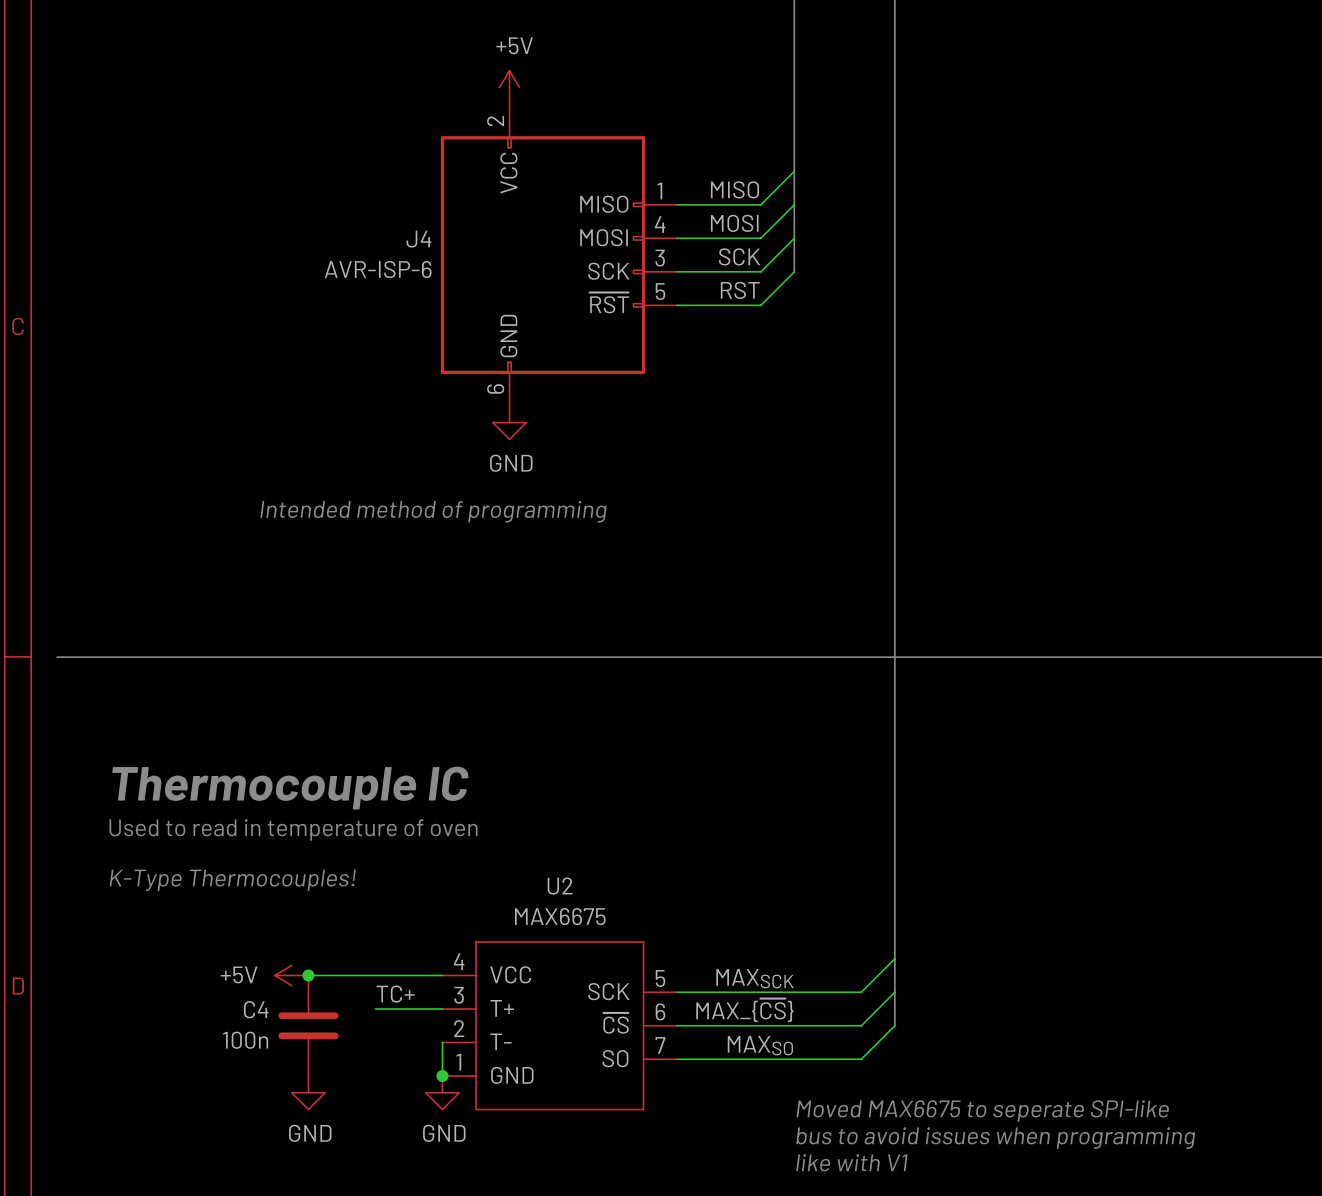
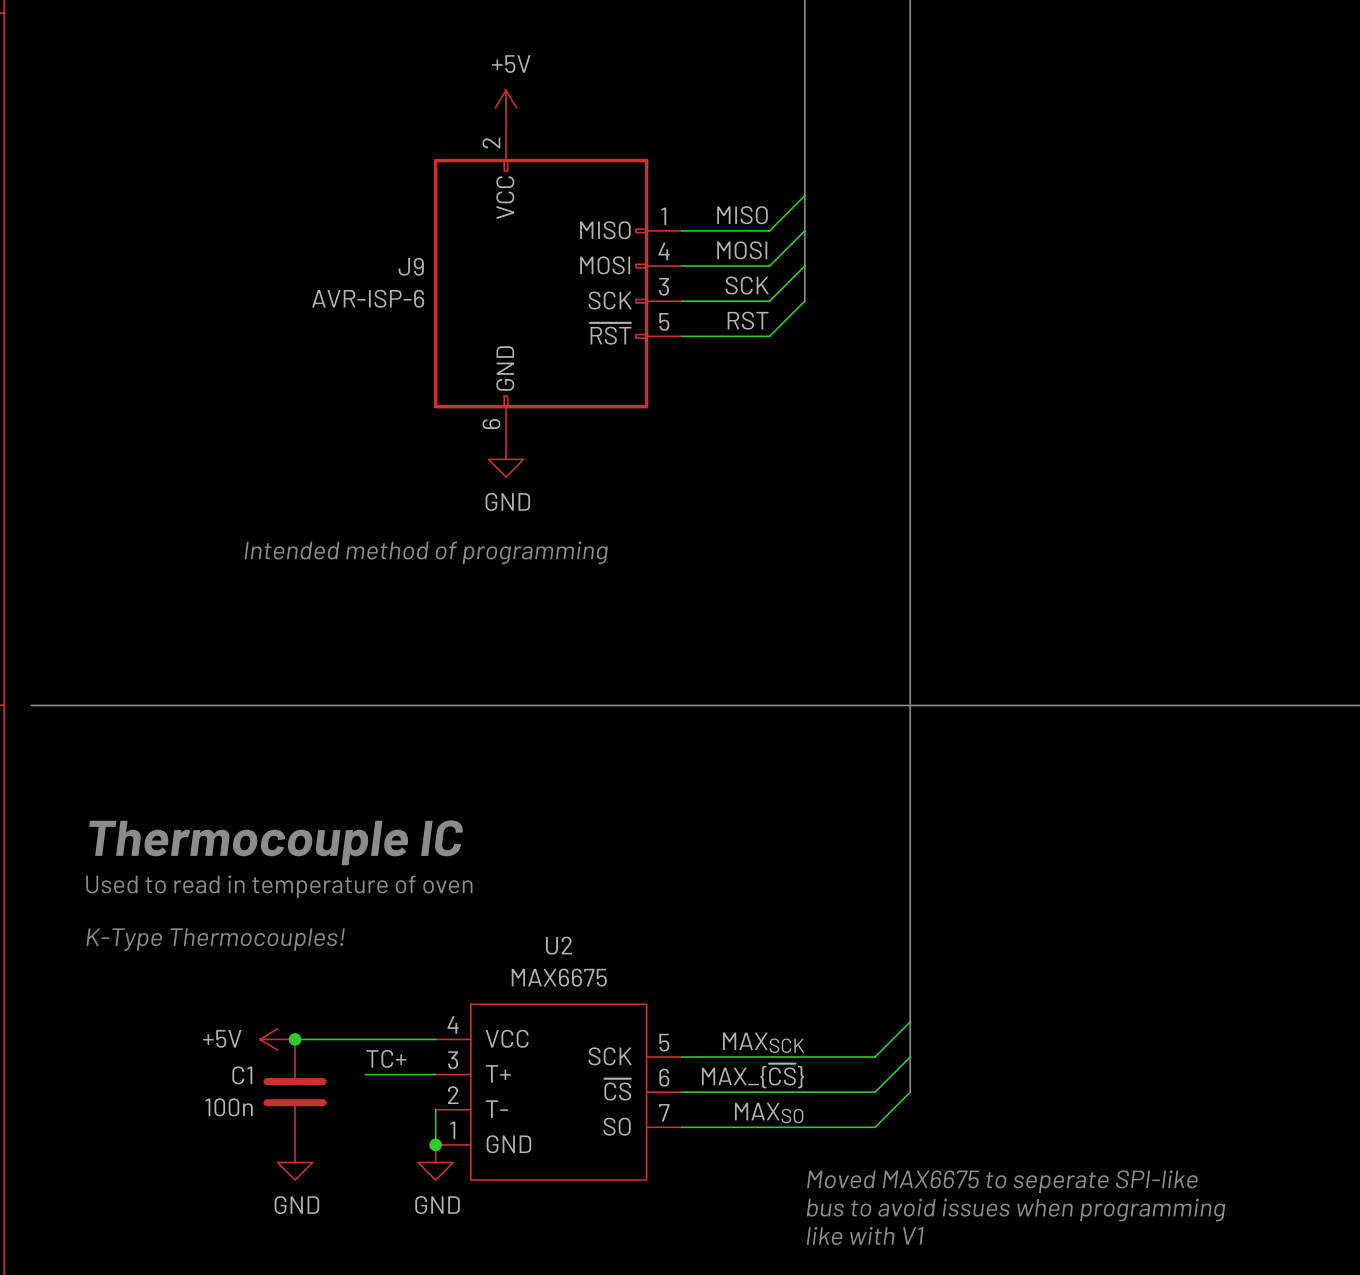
J4 name: J4 (418, 239) -> J9 (411, 266)
C4 name: C4 (256, 1009) -> C1 (242, 1075)

